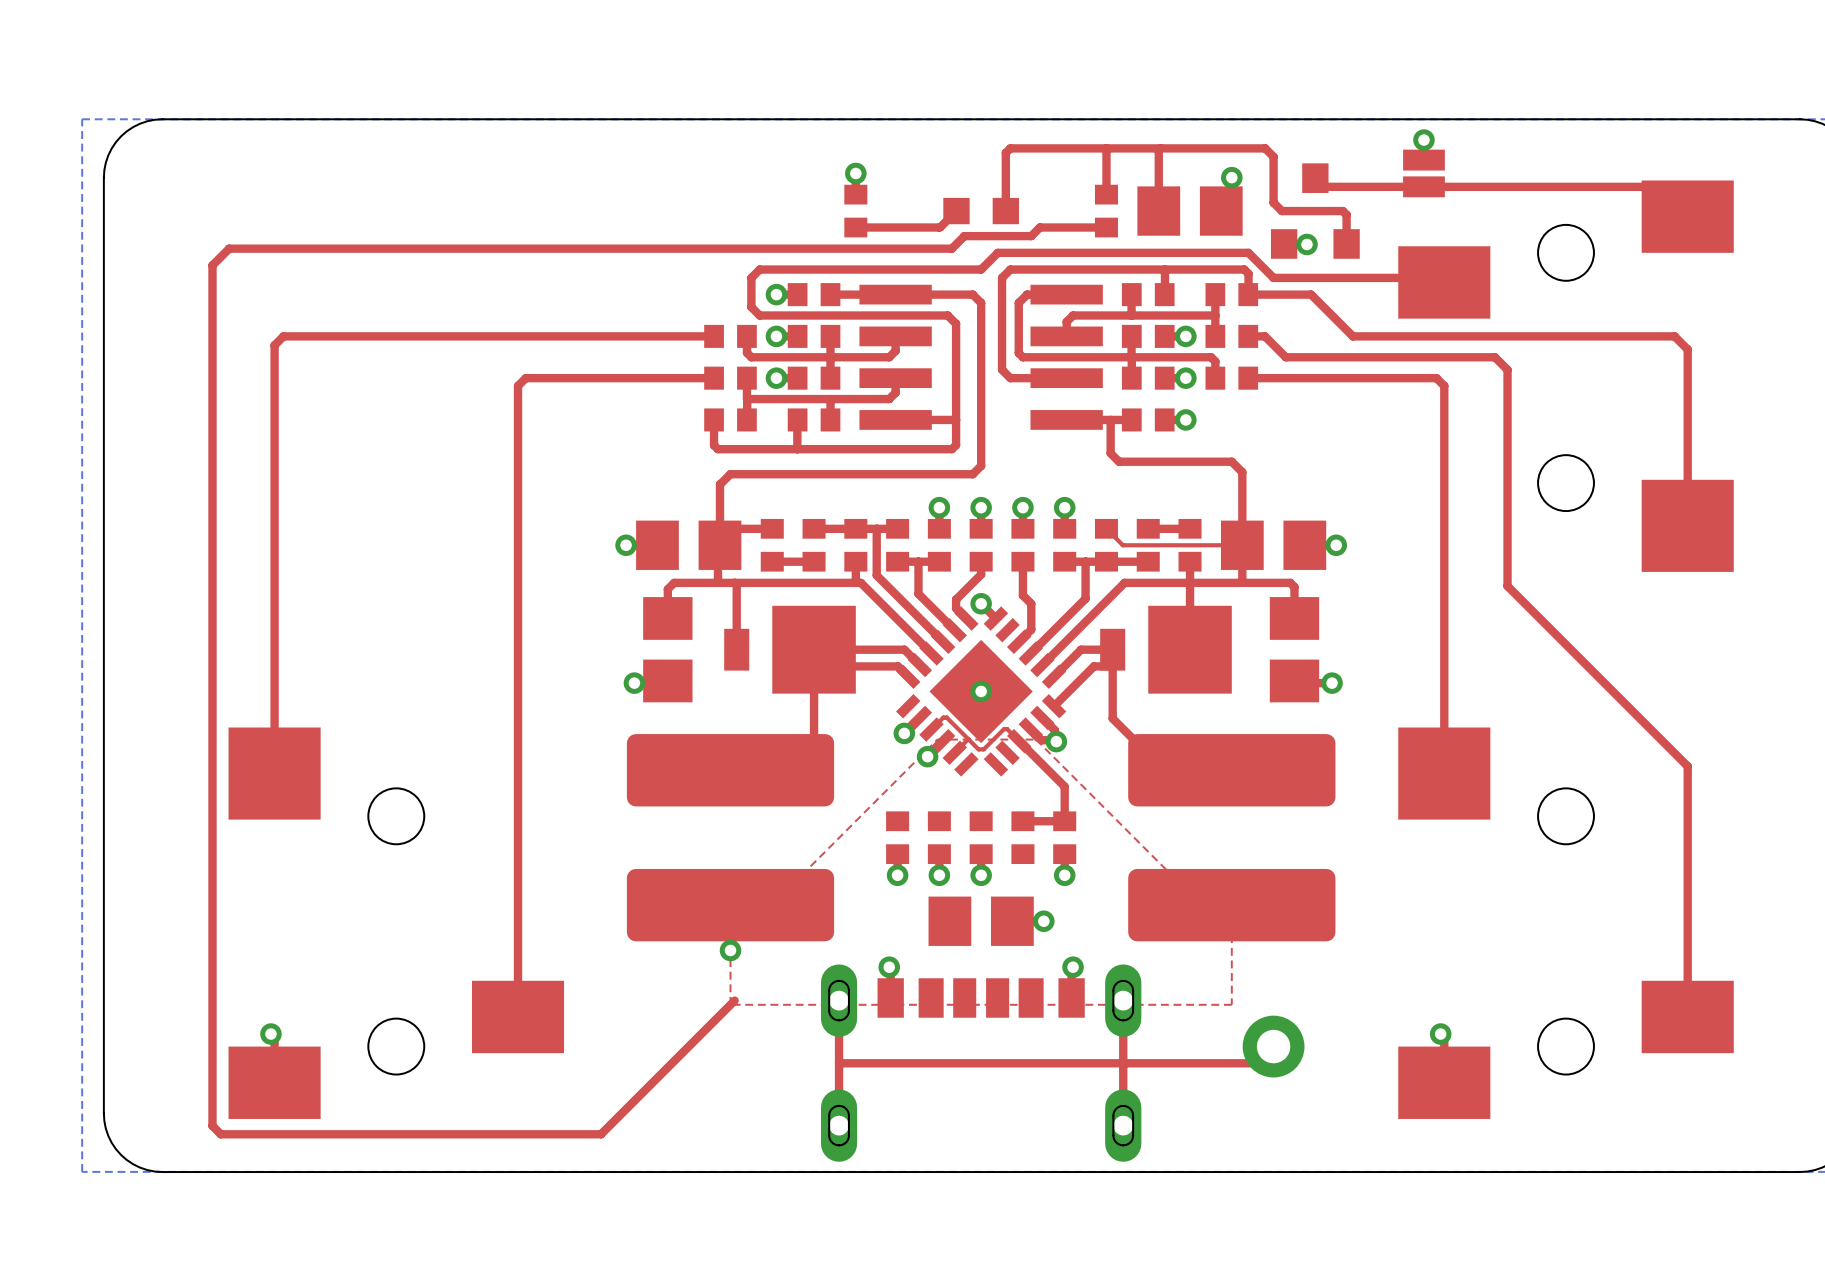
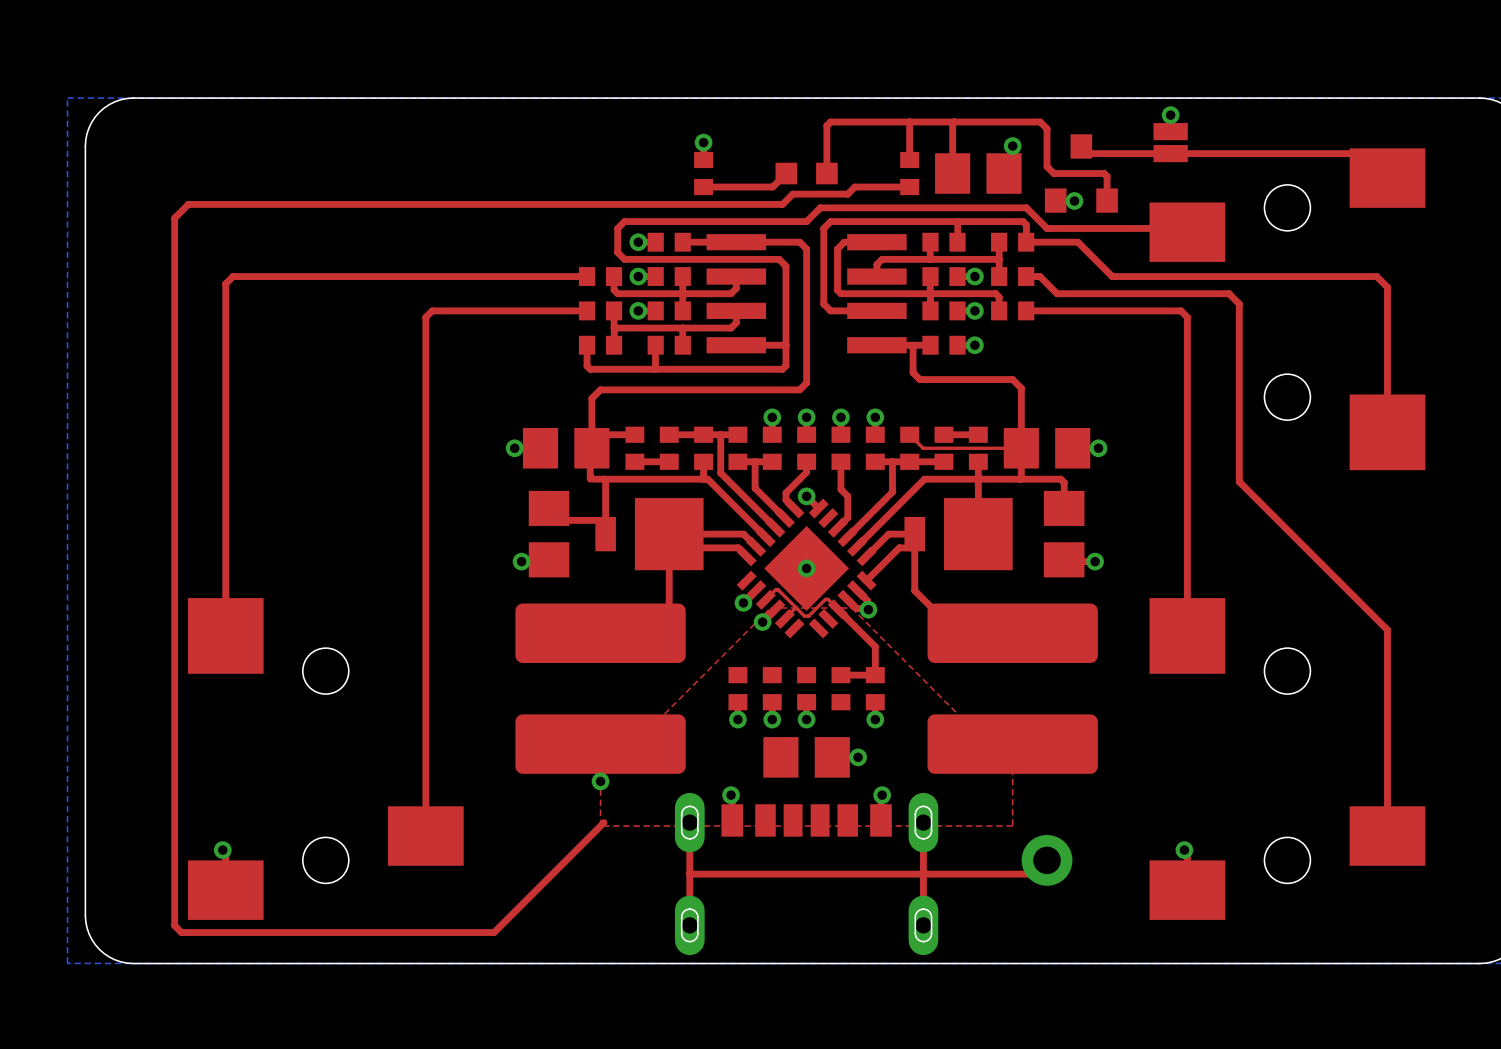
top track: (722, 582) (674, 582) (667, 589) (667, 618) -> (605, 520) (560, 520) (549, 508)

